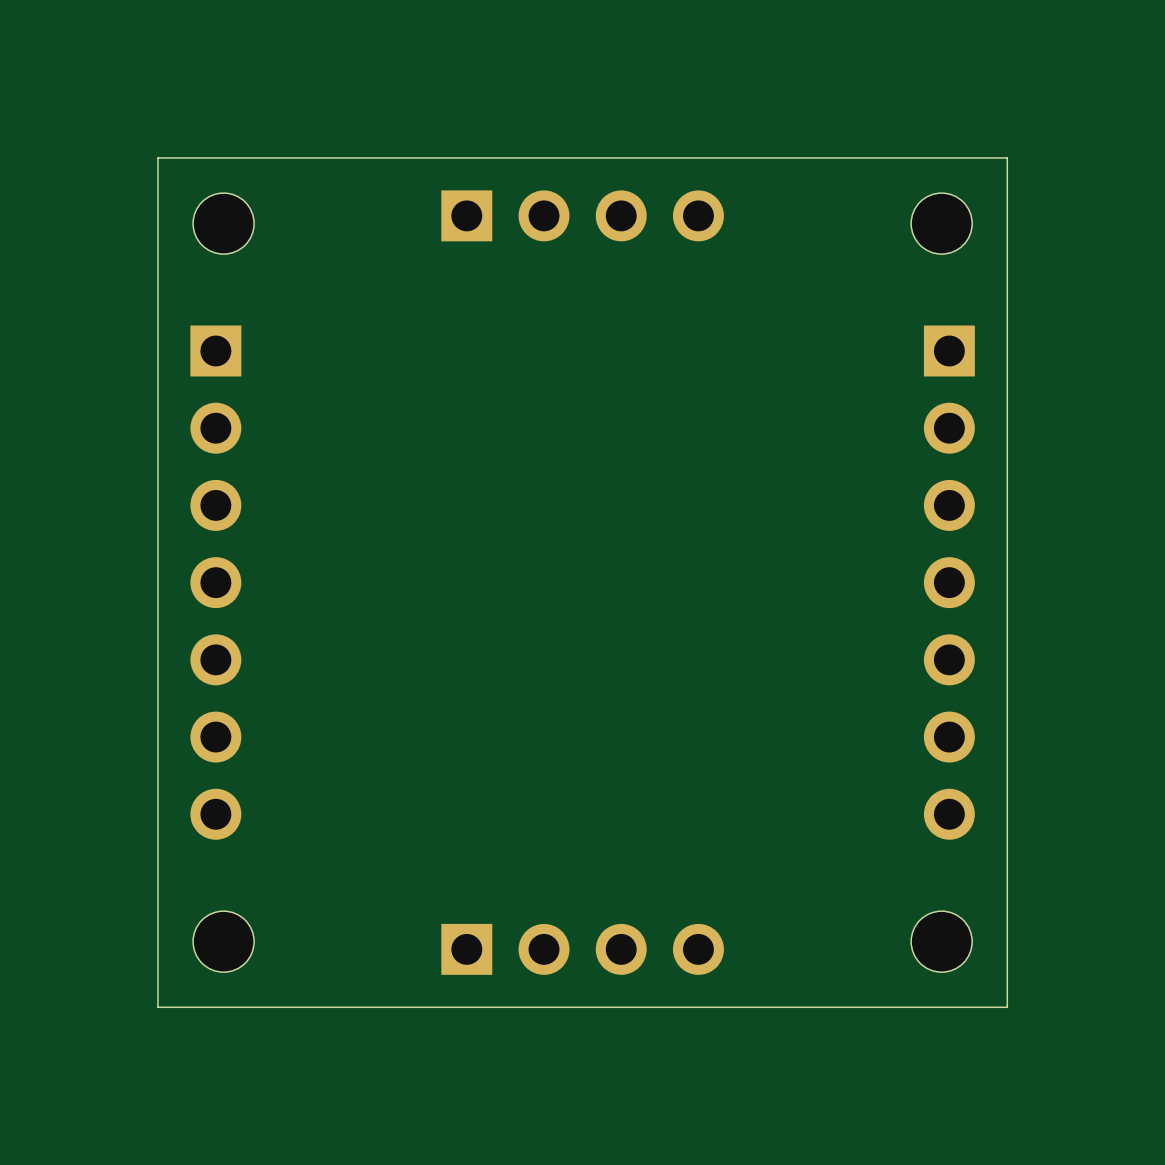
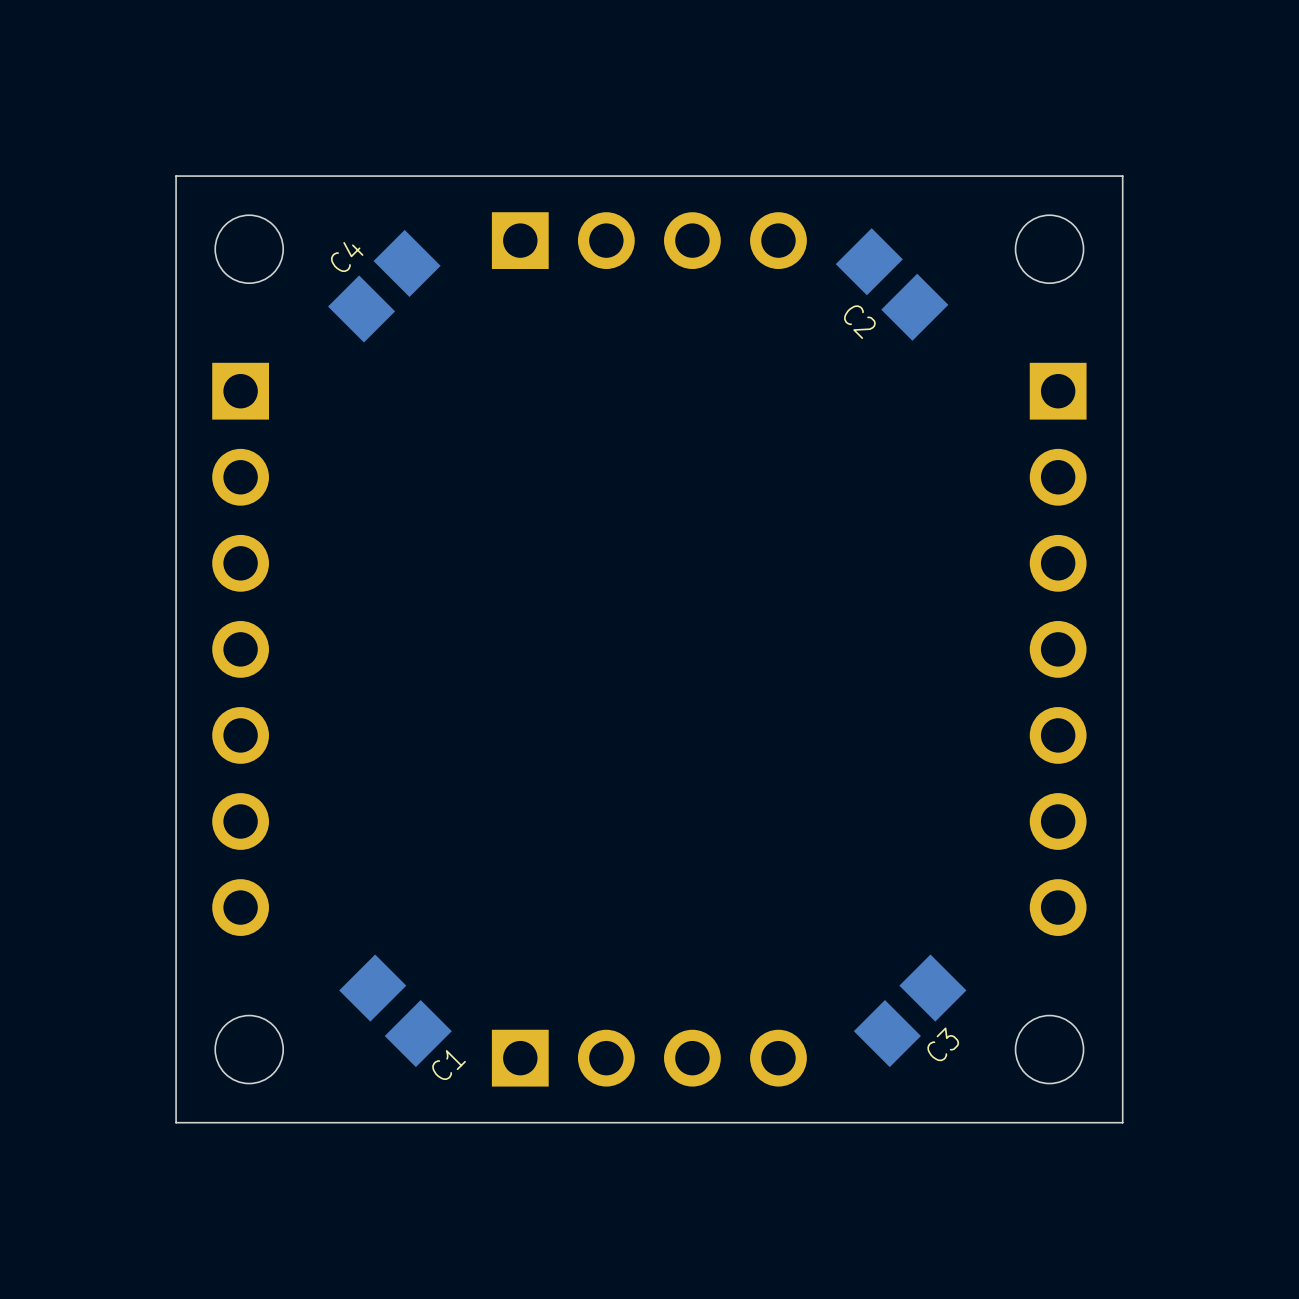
C2: none -> (892, 284)
C4: none -> (384, 286)
C1: none -> (395, 1010)
C3: none -> (910, 1010)

